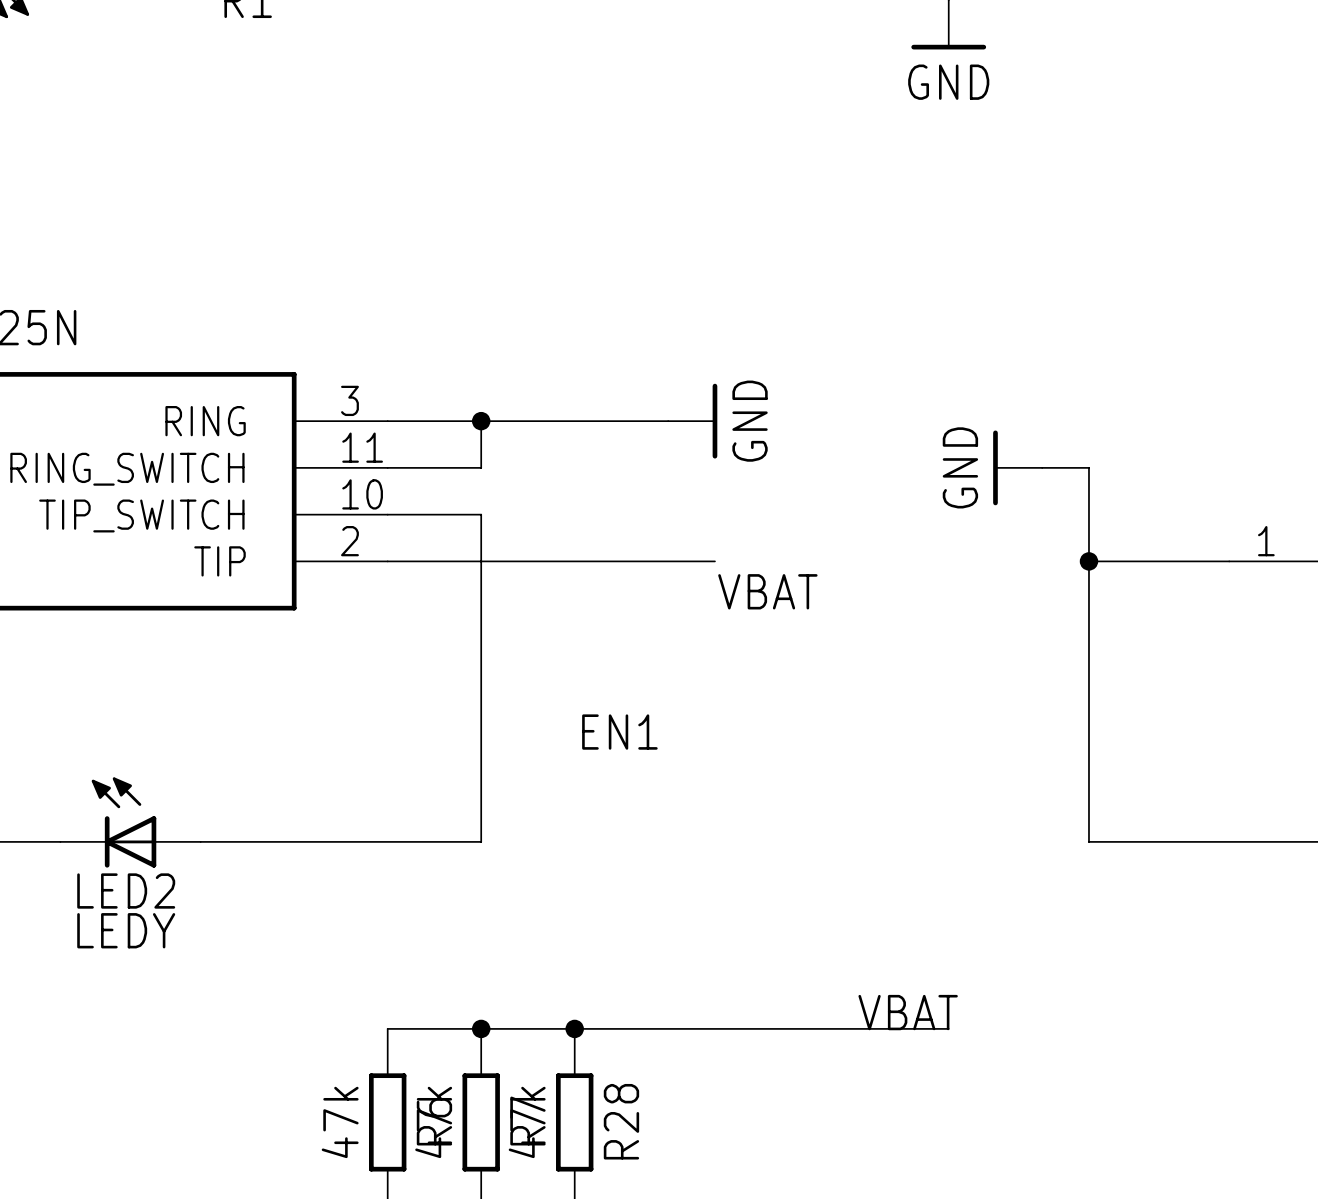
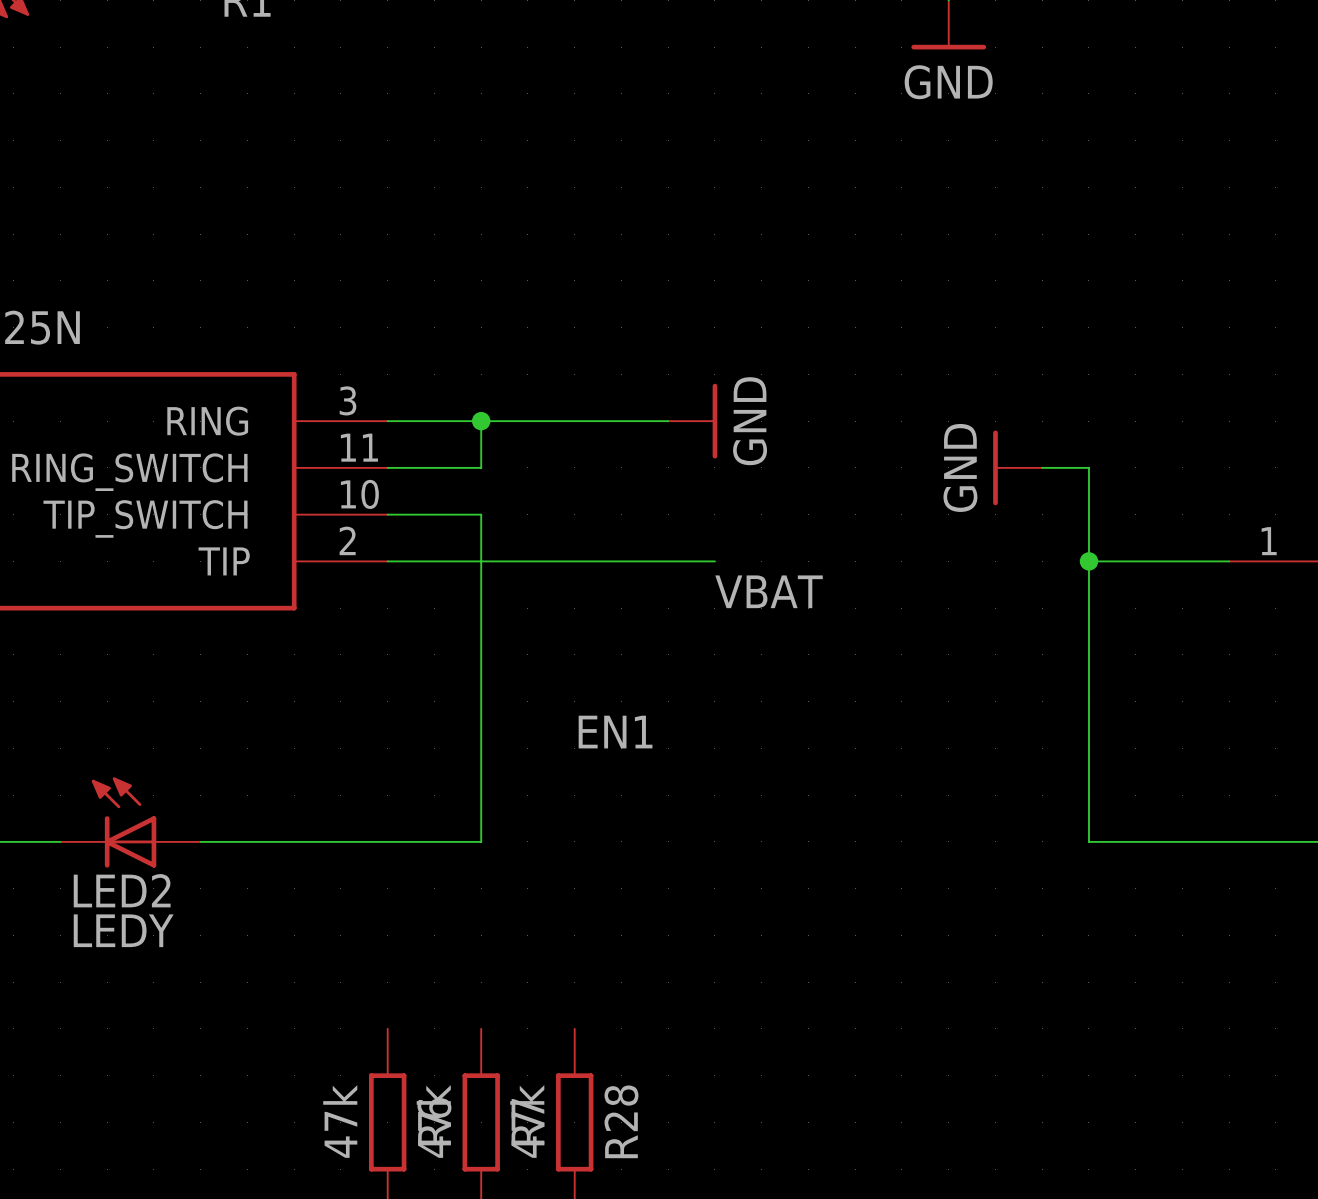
label: VBAT (908, 1012) -> none
wire: (387, 1028) (948, 1028) -> none
junction: (481, 1028) -> none
junction: (574, 1028) -> none

